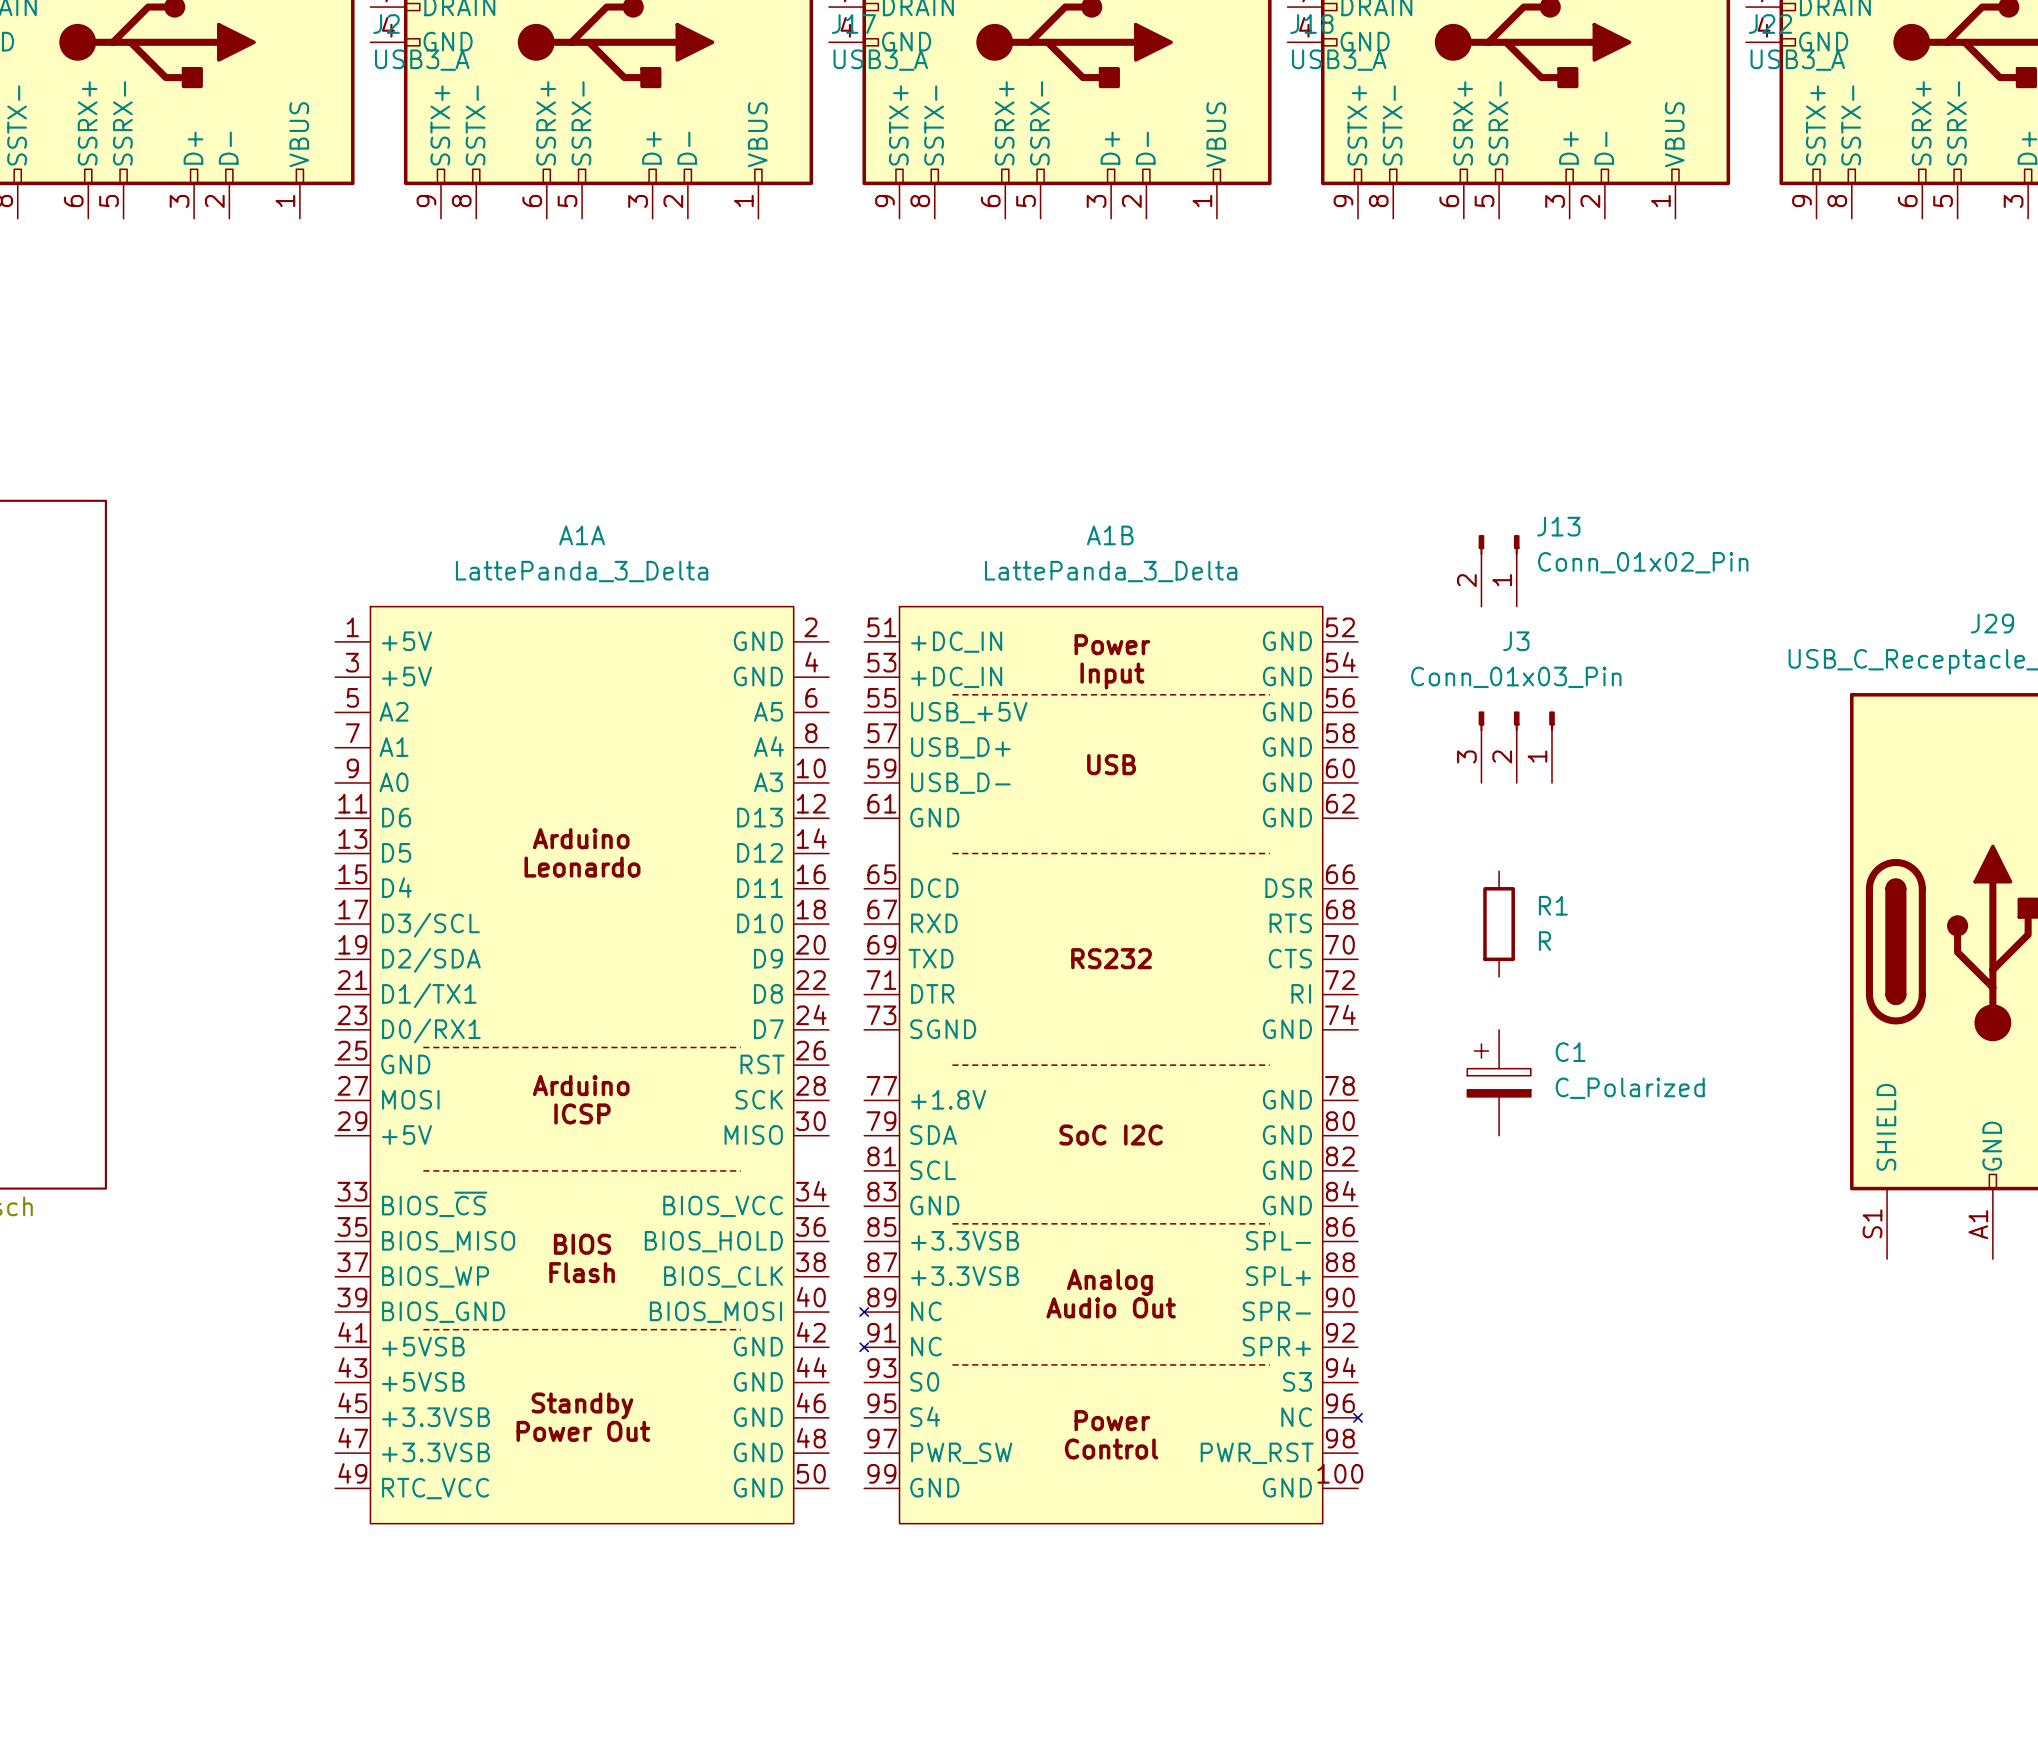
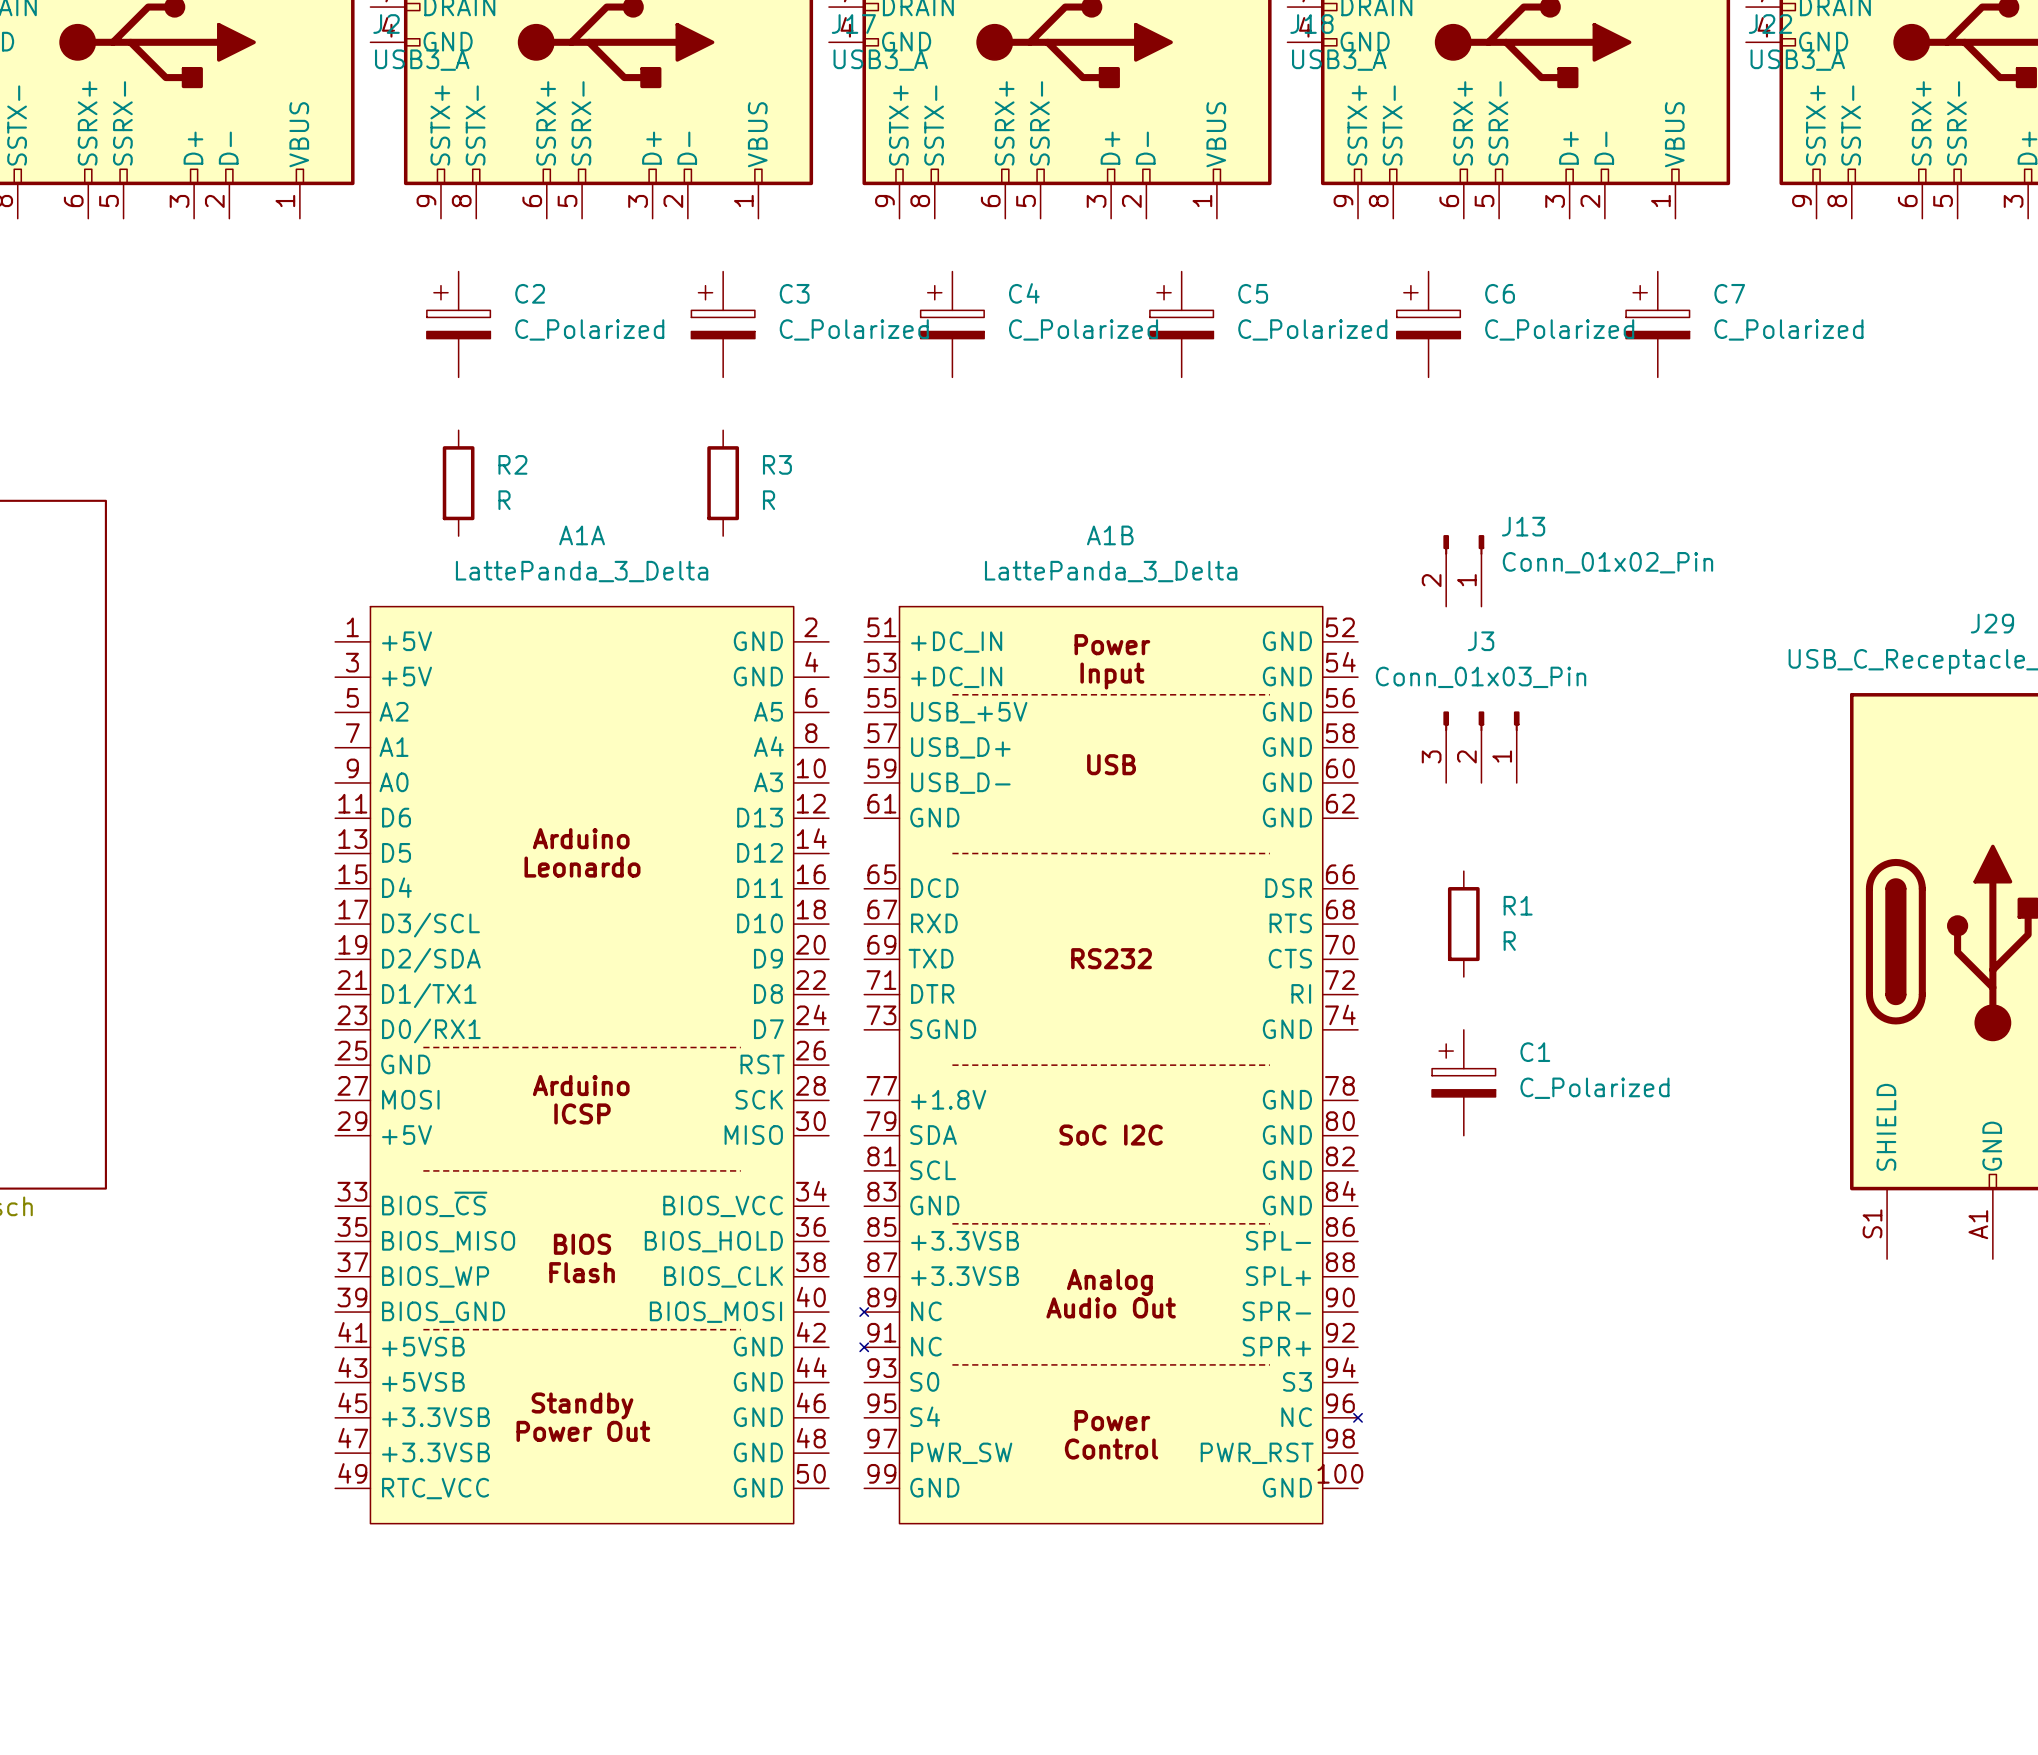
C2: none -> C_Polarized (458, 324)
C3: none -> C_Polarized (723, 324)
C4: none -> C_Polarized (952, 324)
C5: none -> C_Polarized (1181, 324)
C6: none -> C_Polarized (1428, 324)
C7: none -> C_Polarized (1657, 324)
R2: none -> R (458, 483)
R3: none -> R (723, 483)
J13 position: (1499, 570) -> (1463, 570)
J3 position: (1516, 747) -> (1481, 747)
R1 position: (1499, 924) -> (1463, 924)
C1 position: (1499, 1082) -> (1463, 1082)

